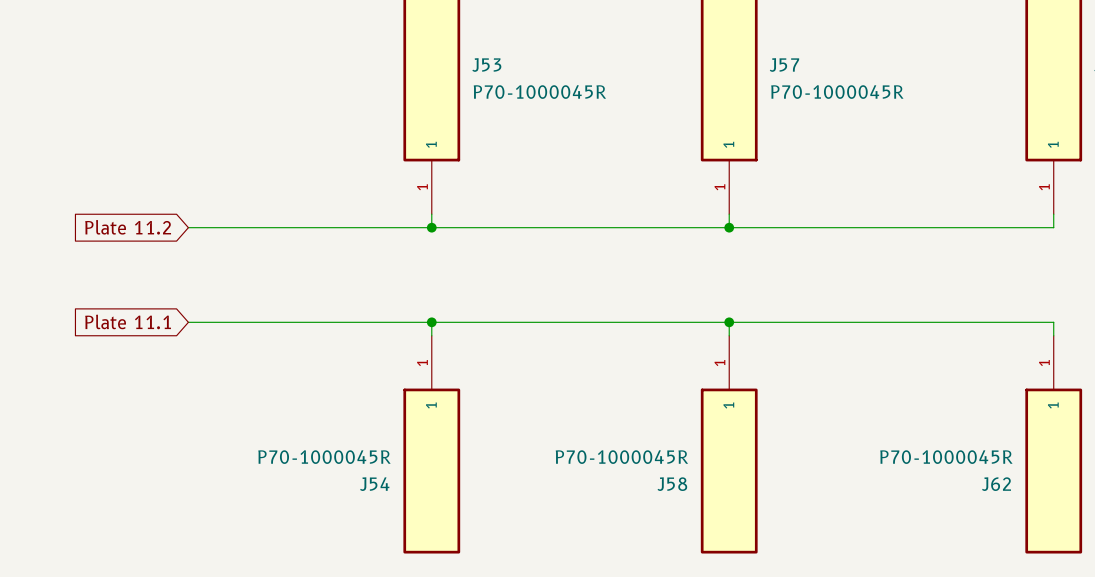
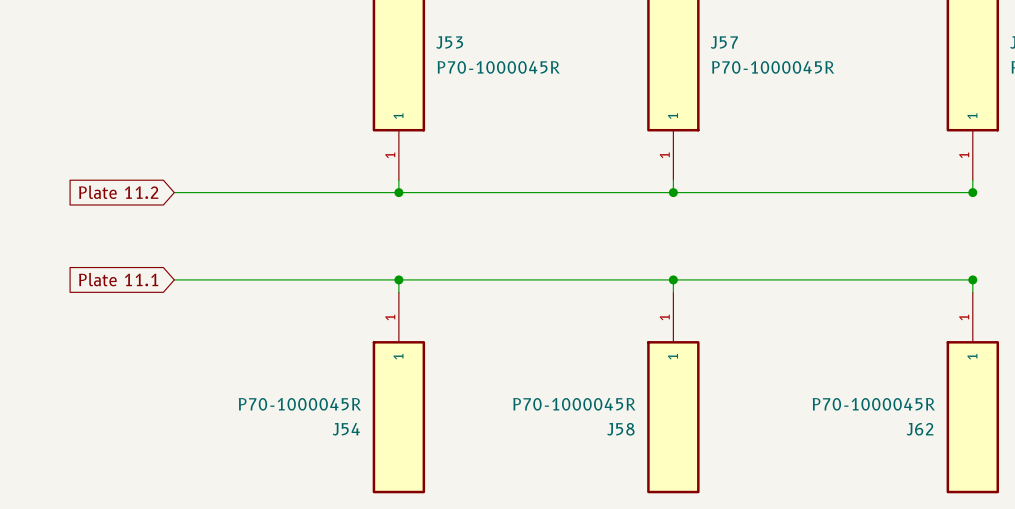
junction: none -> (972, 192)
junction: none -> (972, 279)

